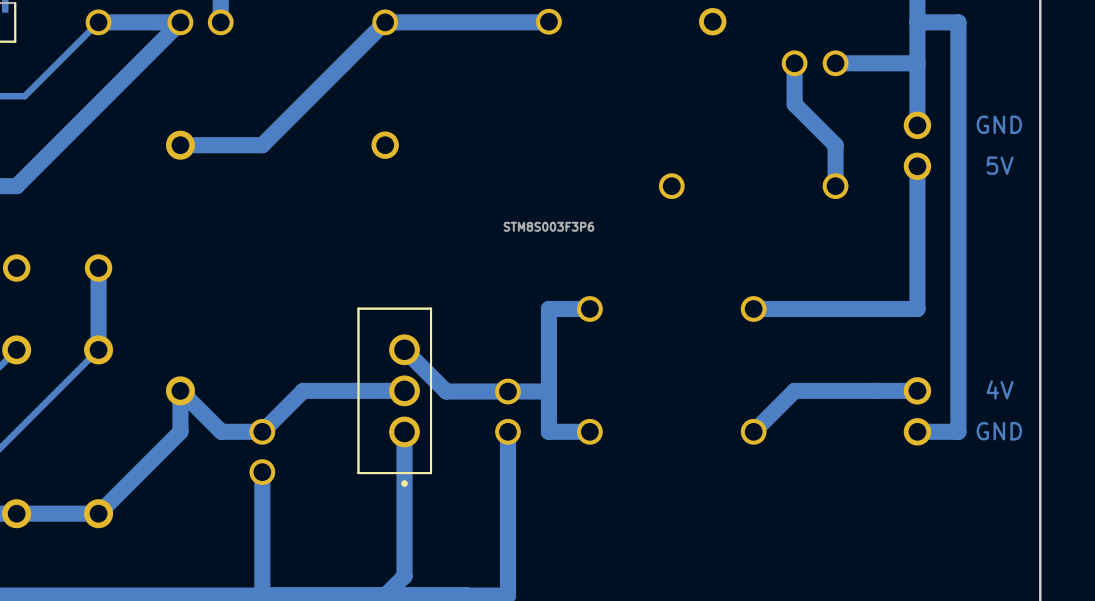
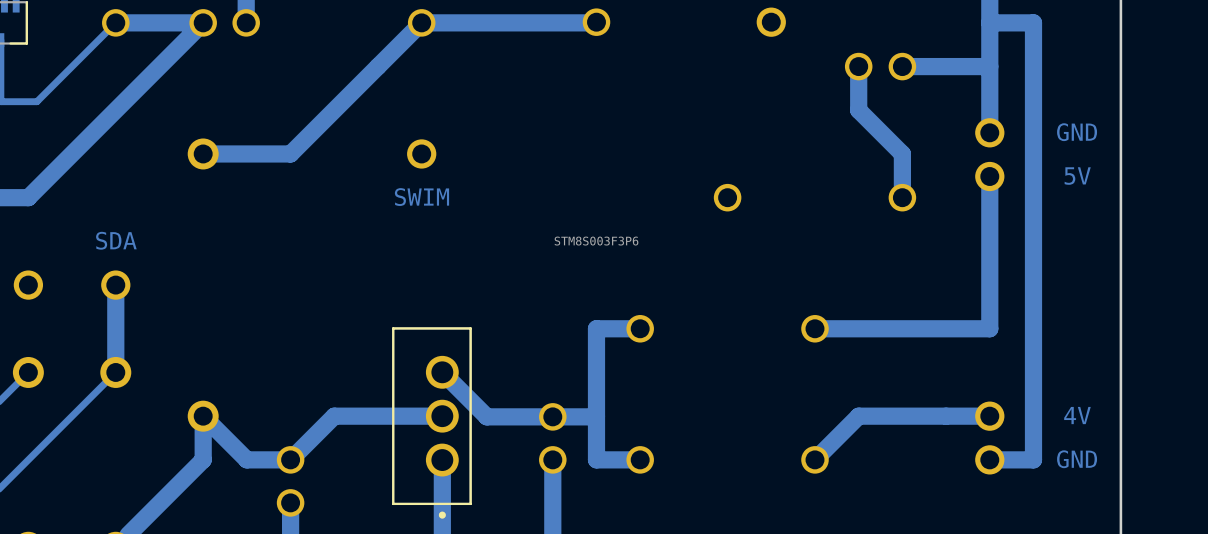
part value: none -> SWIM (421, 197)
part value: none -> SDA (116, 240)

